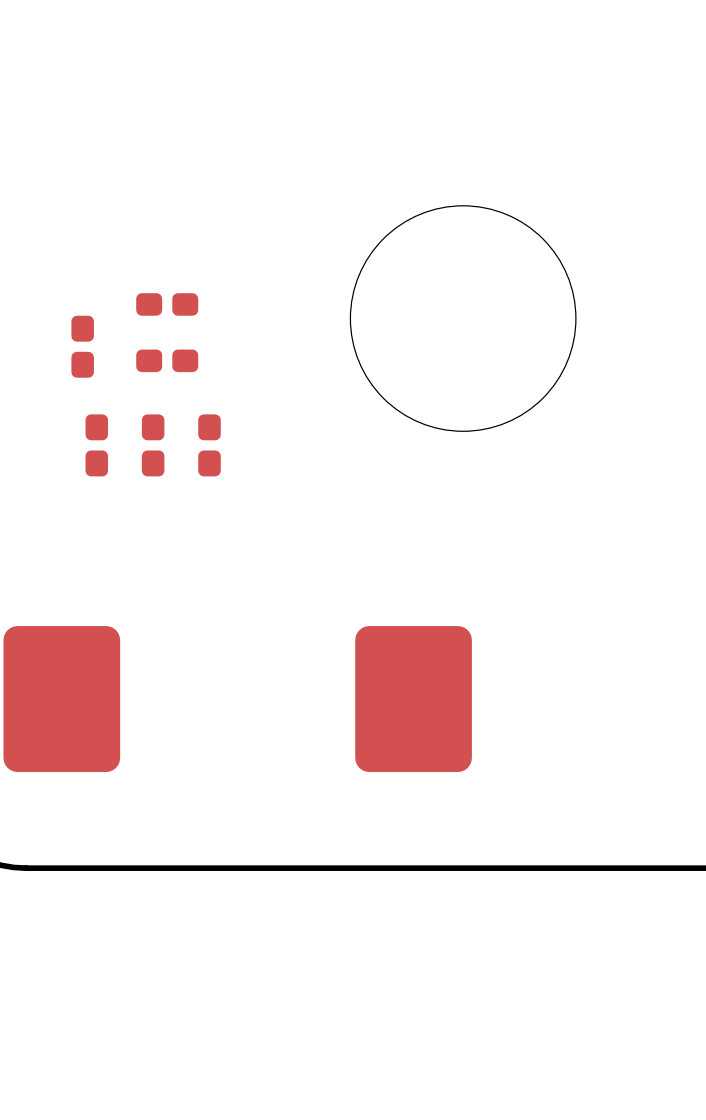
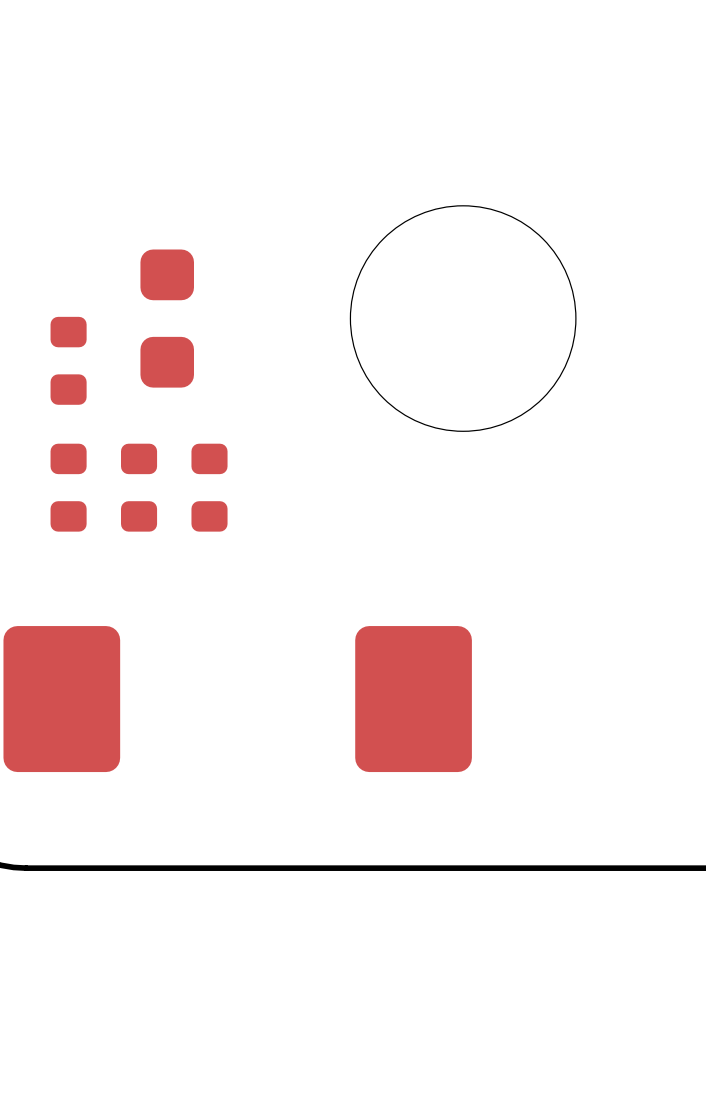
part footprint: [136, 293, 199, 316] -> [140, 249, 195, 388]
part footprint: [71, 315, 94, 378] -> [50, 316, 87, 405]
part: (167, 360) -> none
part: (96, 445) -> none
part: (153, 445) -> none
part: (209, 445) -> none
part: none -> (68, 487)
part: none -> (139, 487)
part: none -> (209, 487)

